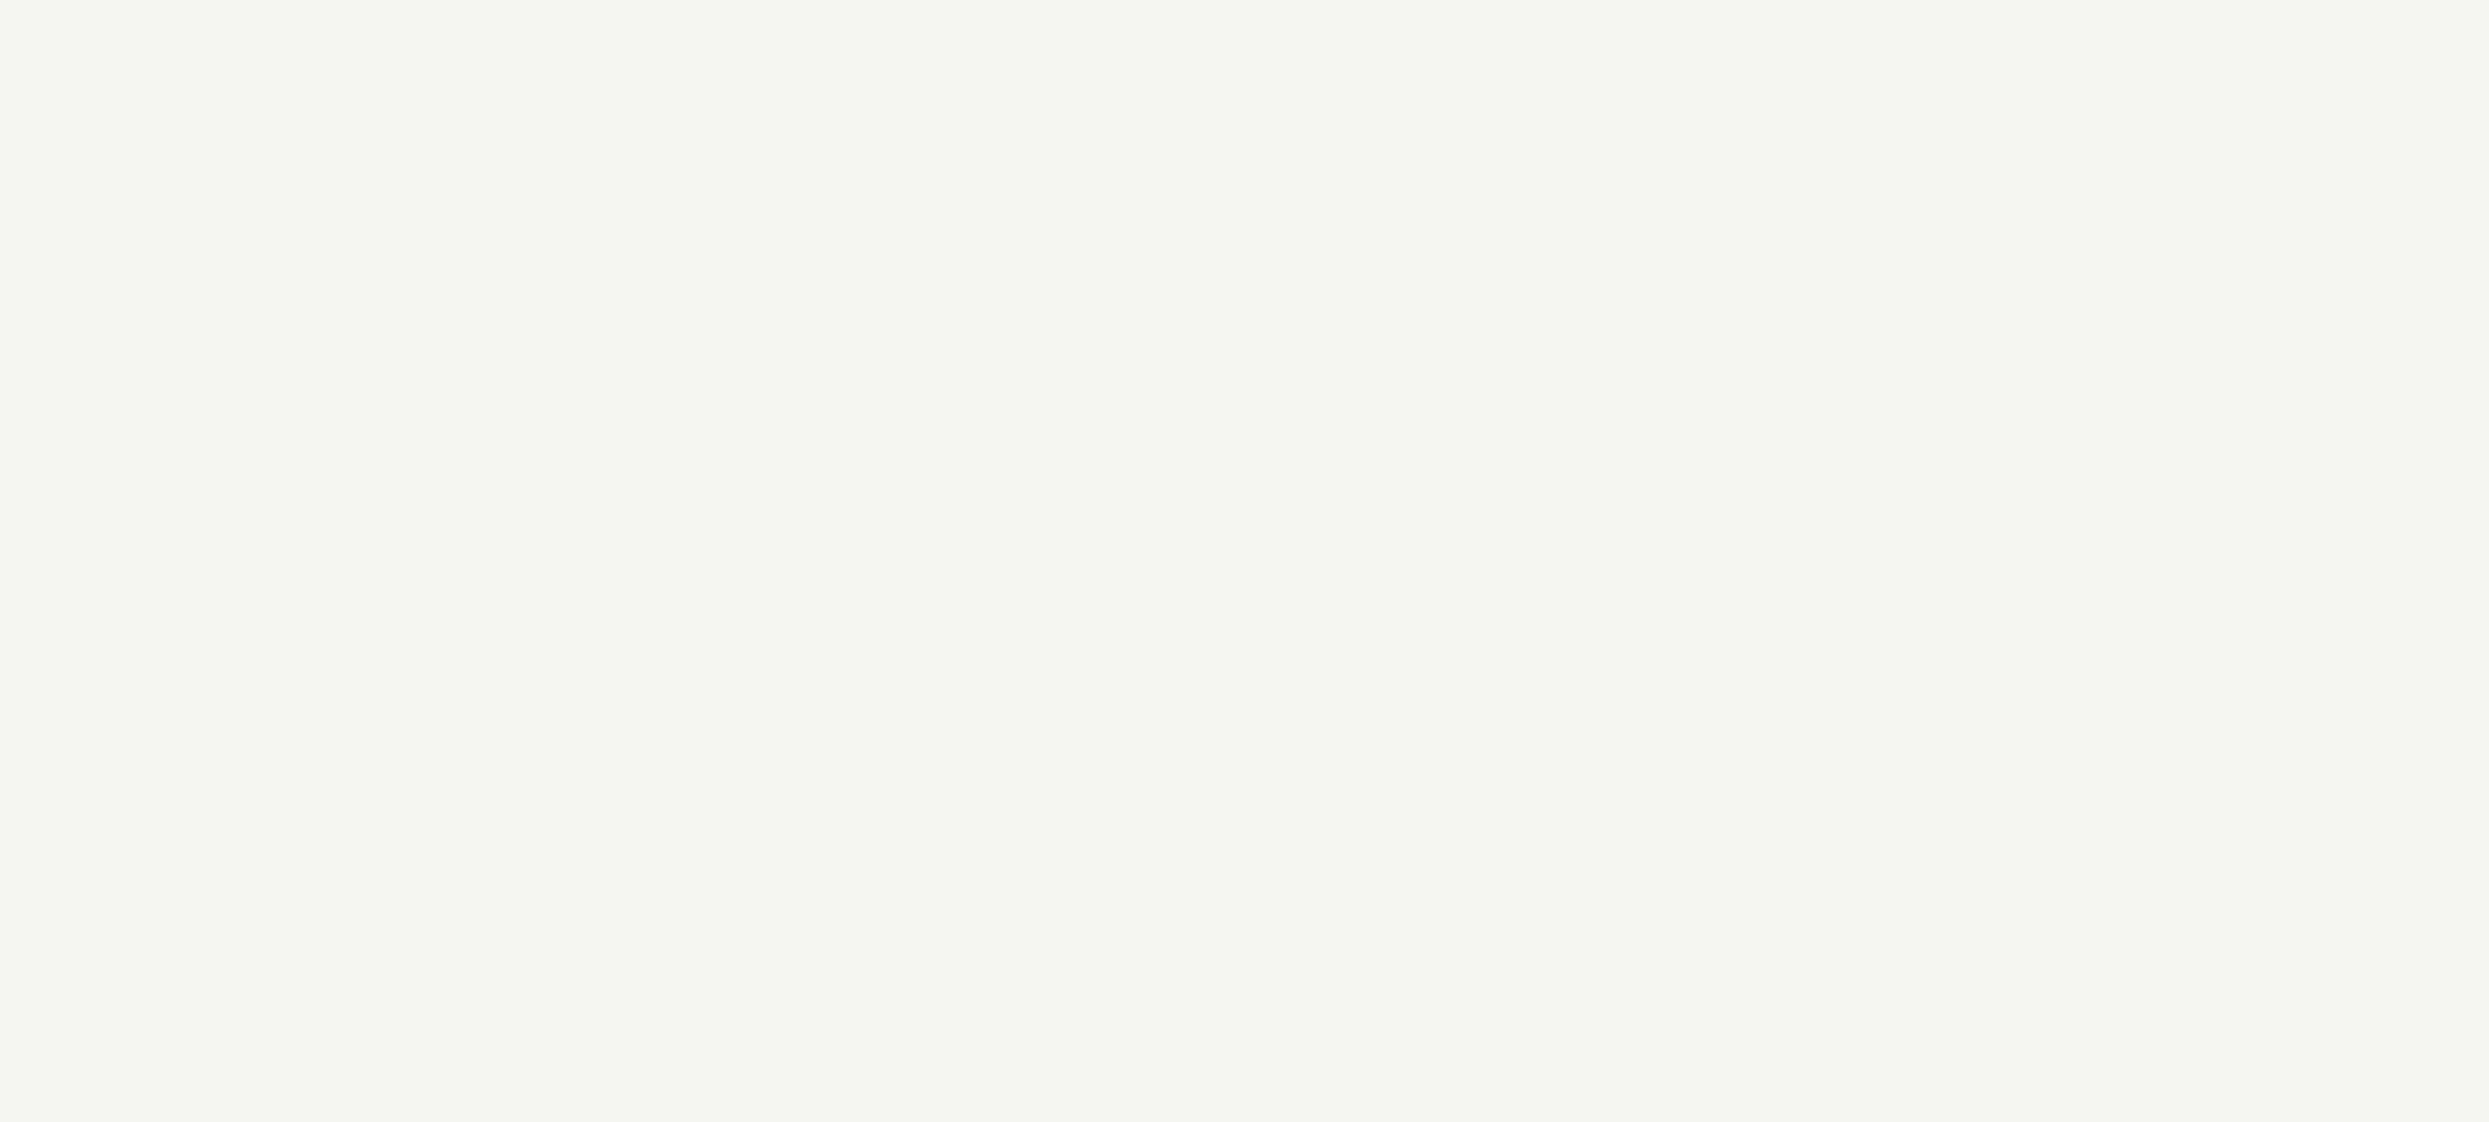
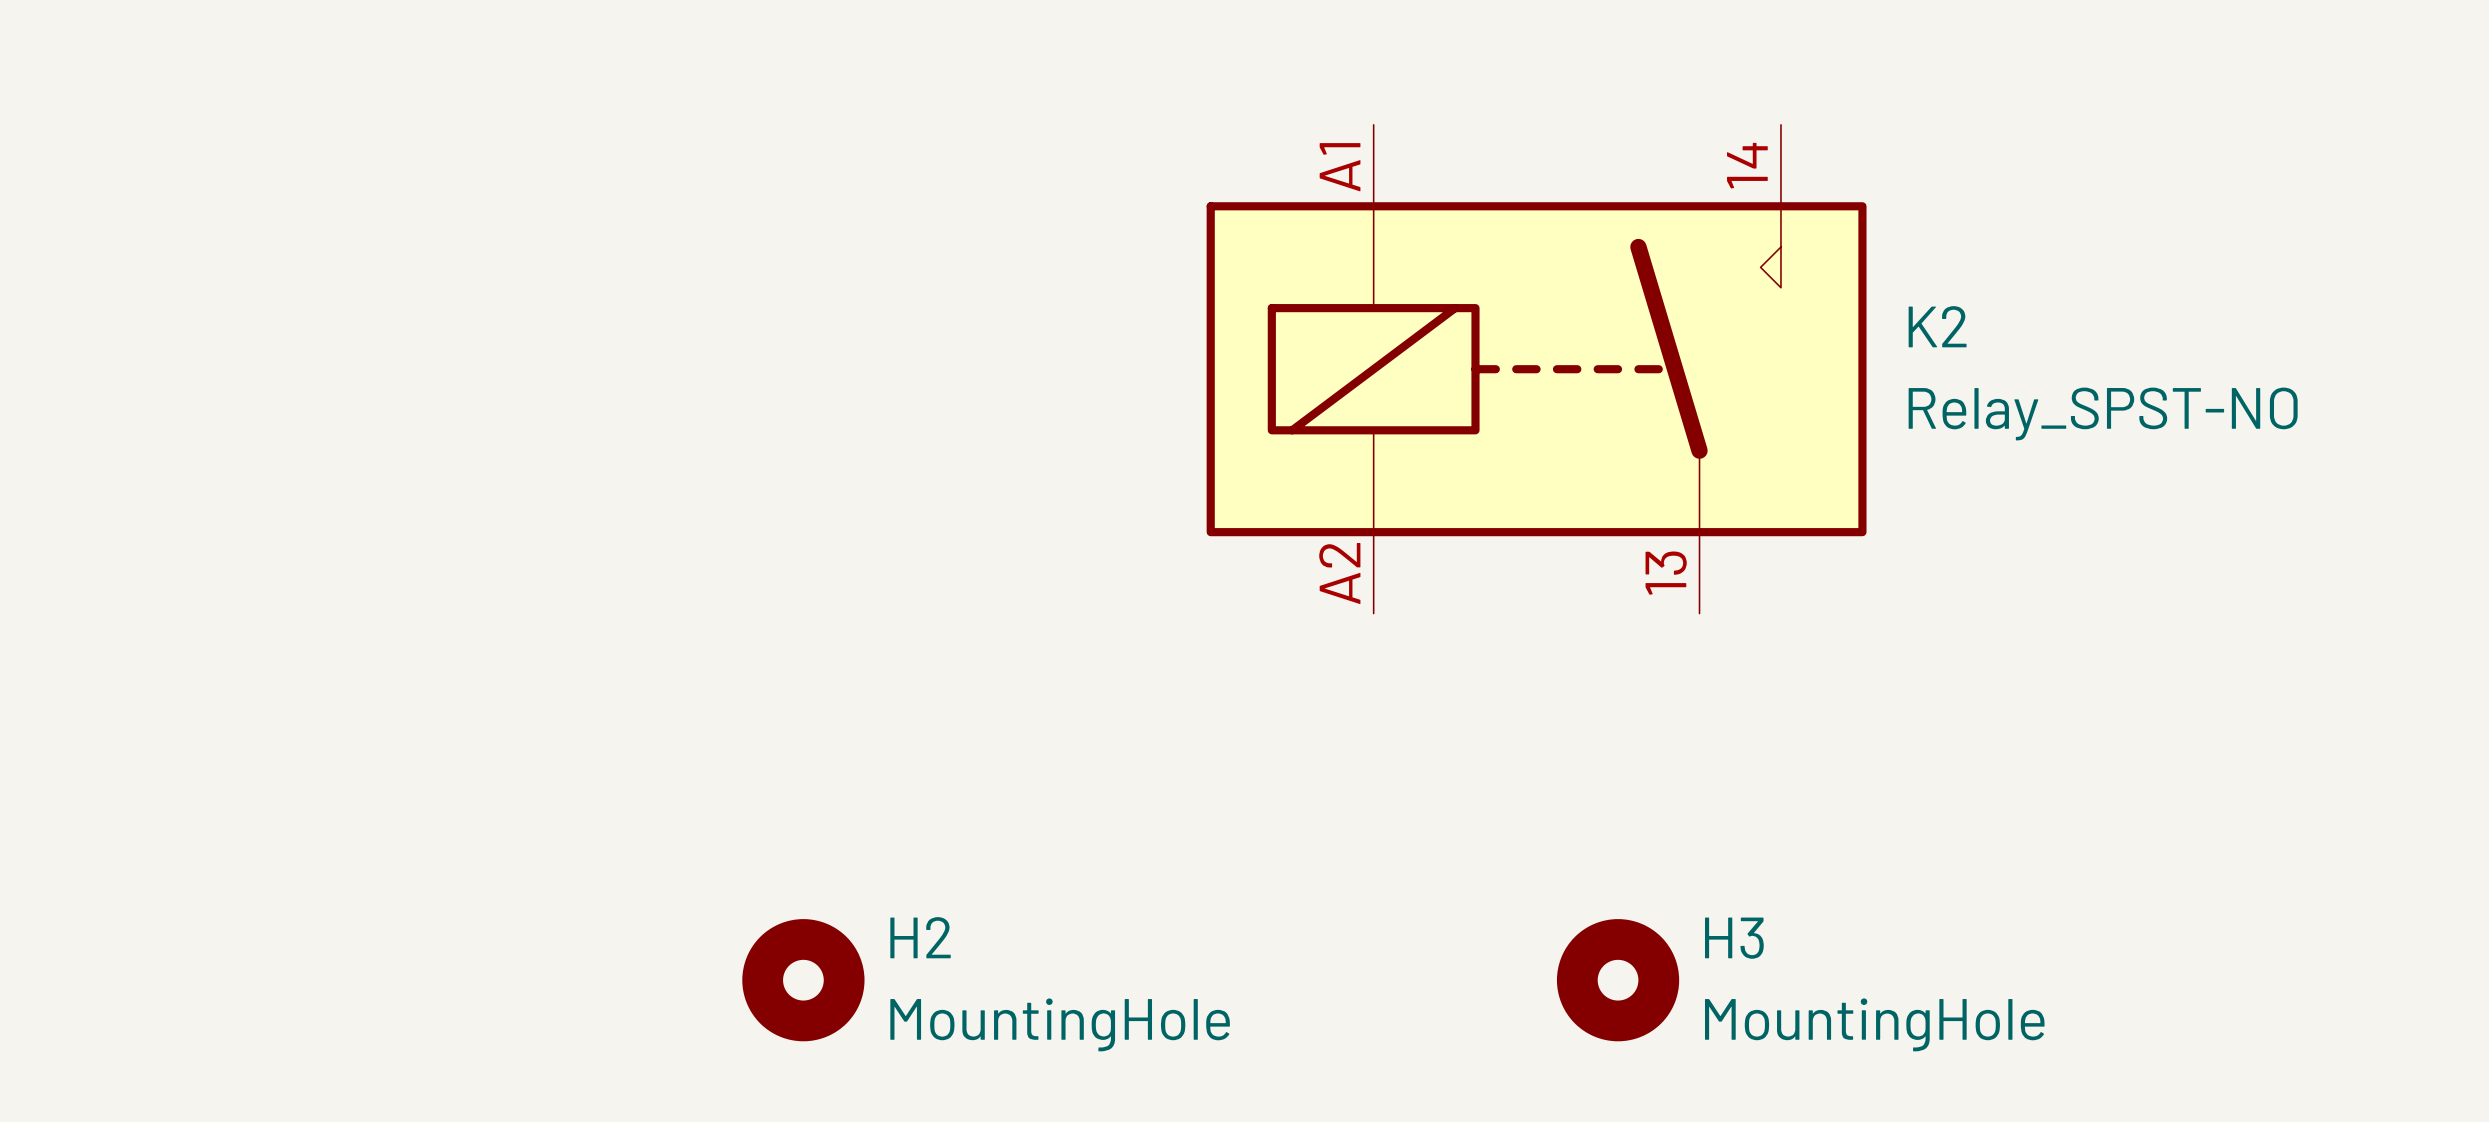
K2: none -> Relay_SPST-NO (1536, 369)
H2: none -> MountingHole (803, 980)
H3: none -> MountingHole (1618, 980)

